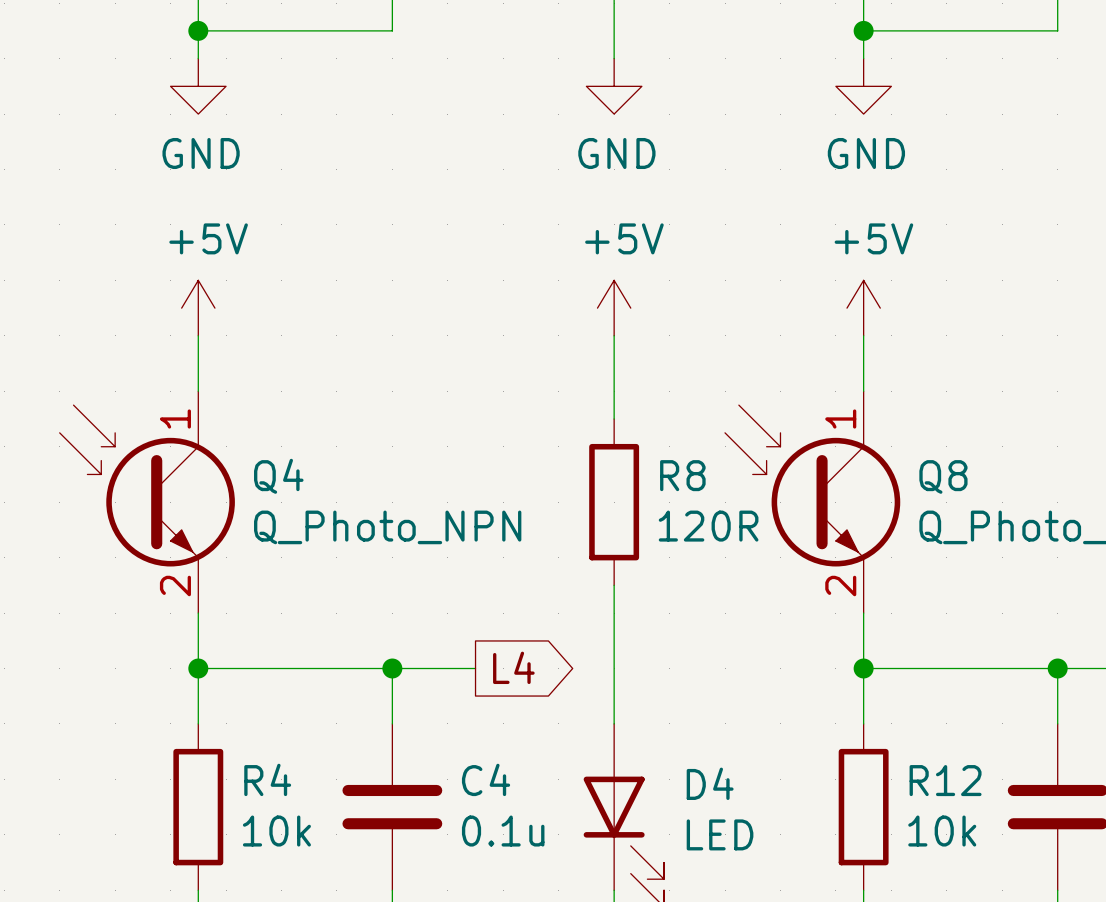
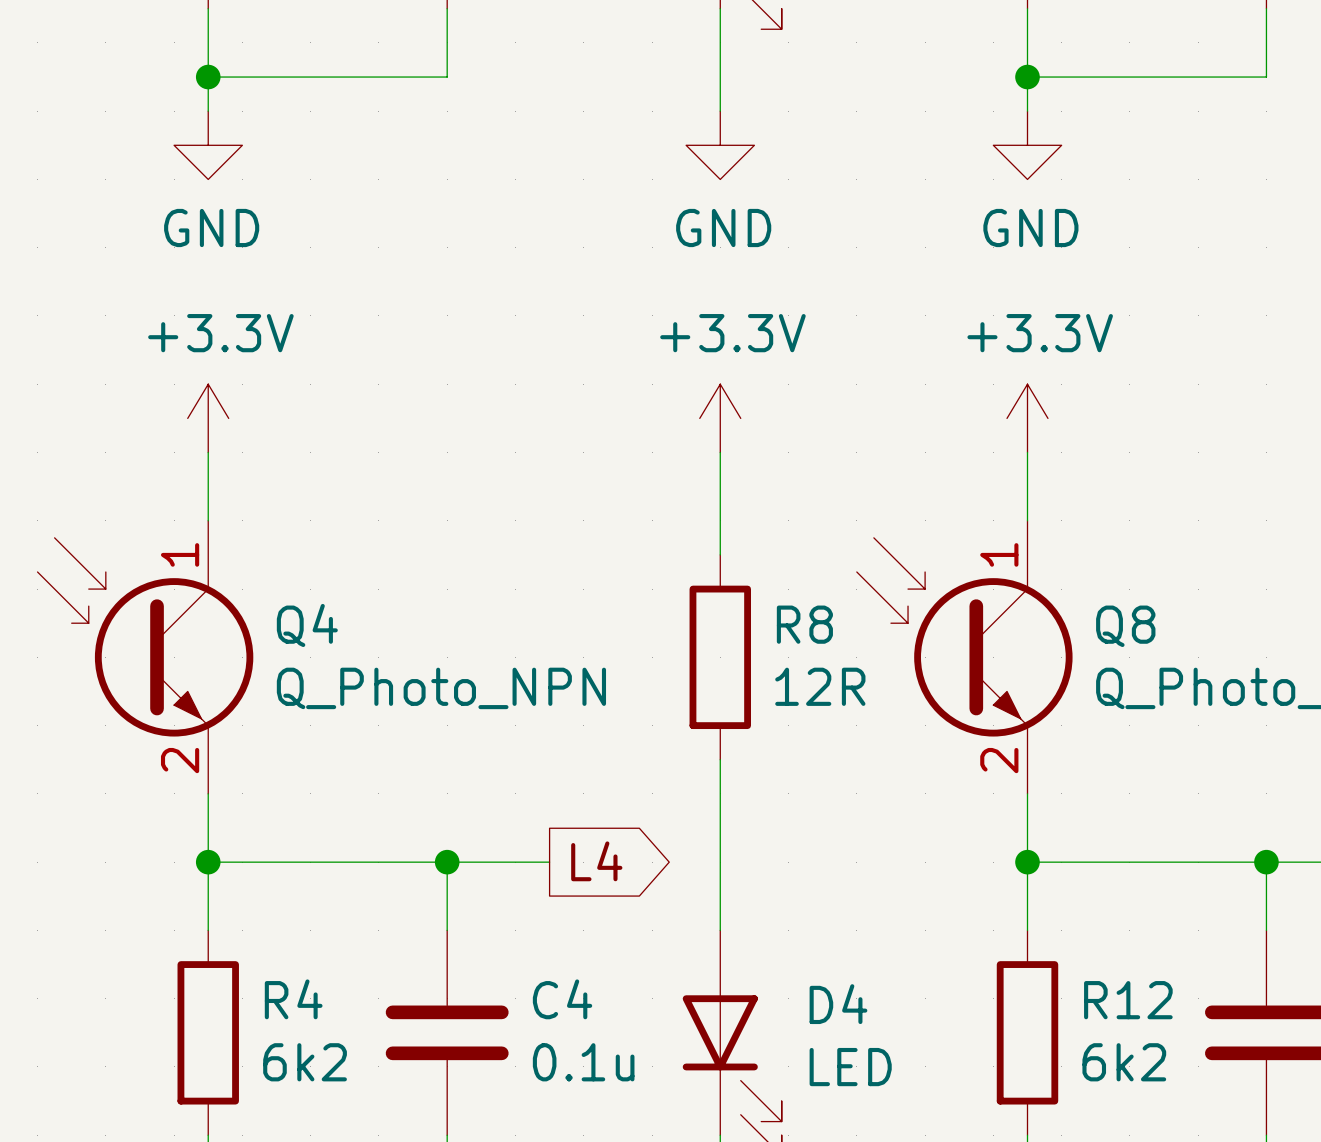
power symbol: +5V (198, 308) -> +3.3V (208, 418)
power symbol: +5V (614, 308) -> +3.3V (720, 418)
power symbol: +5V (863, 308) -> +3.3V (1027, 418)
R8 value: 120R (708, 526) -> 12R (820, 686)
R4 value: 10k (276, 831) -> 6k2 (305, 1062)
R12 value: 10k (942, 831) -> 6k2 (1124, 1062)

